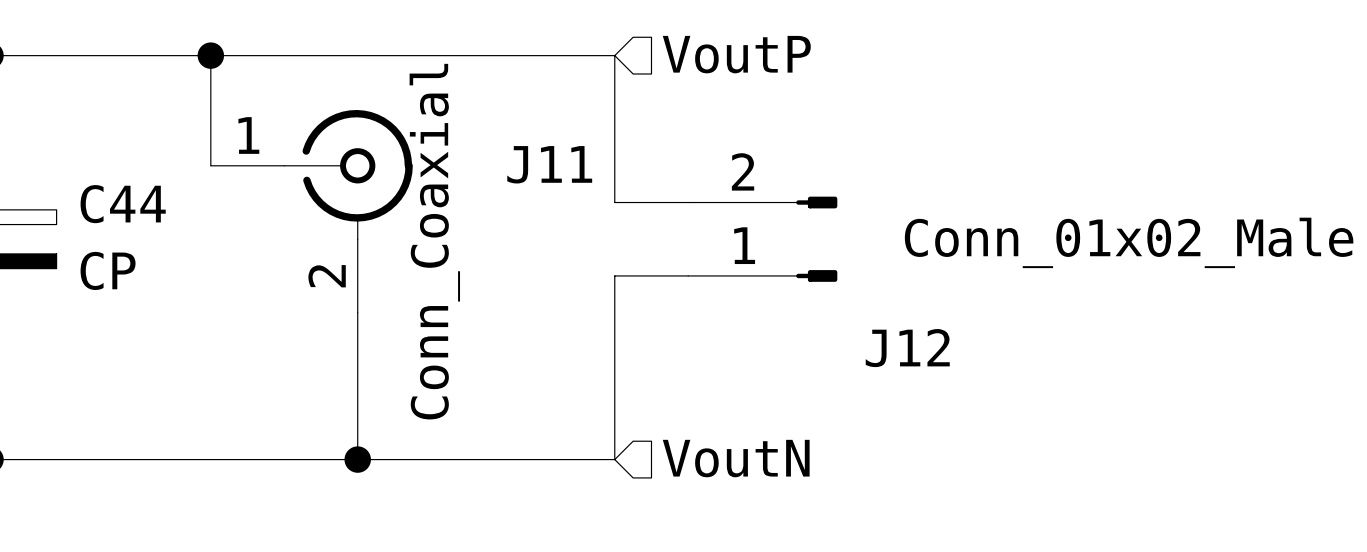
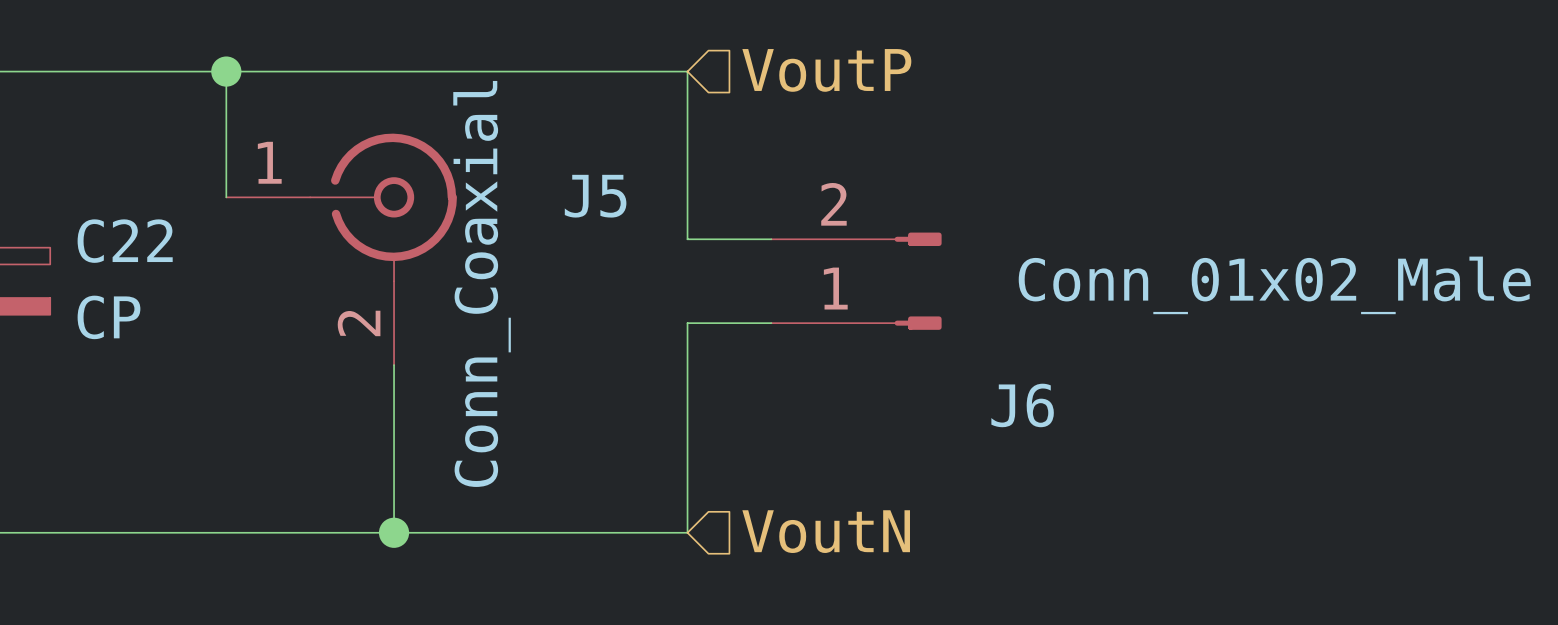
J11 name: J11 (549, 164) -> J5 (595, 196)
C44 name: C44 (123, 204) -> C22 (125, 241)
J12 name: J12 (907, 348) -> J6 (1022, 405)

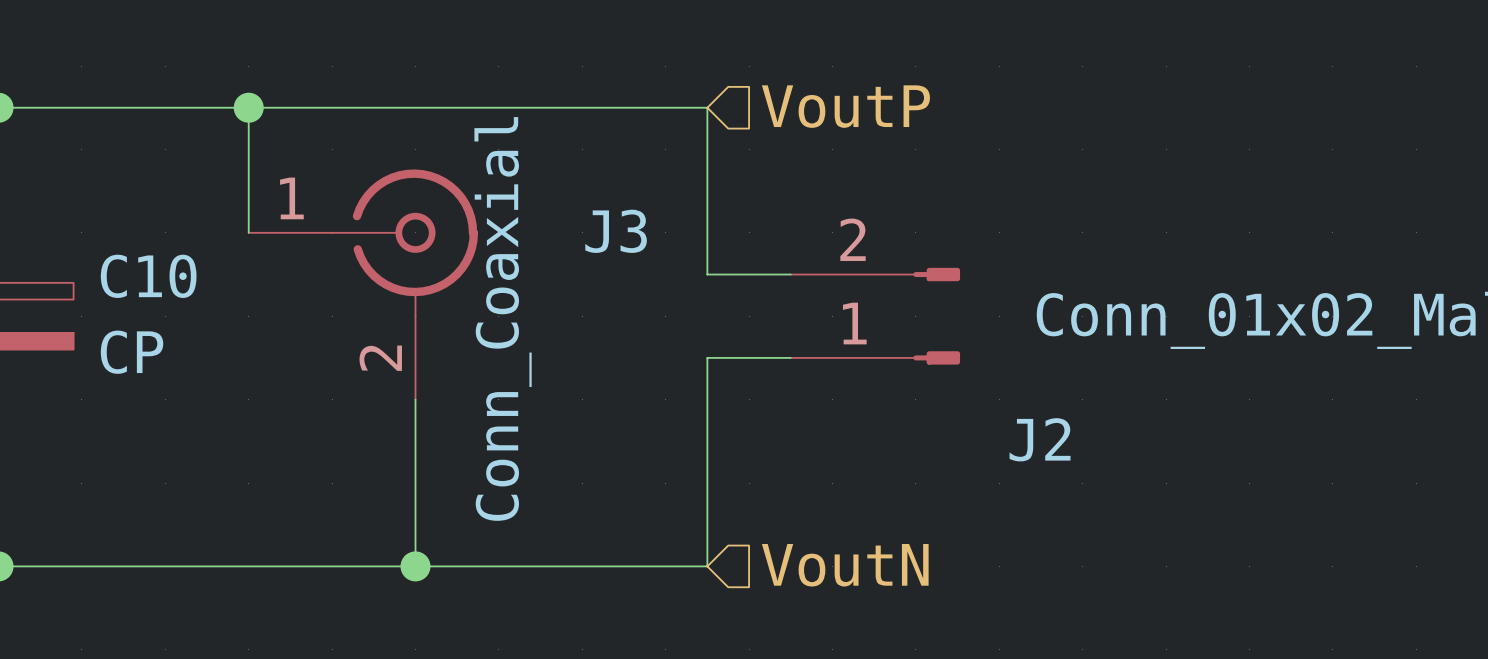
J5 name: J5 (595, 196) -> J3 (616, 231)
C22 name: C22 (125, 241) -> C10 (148, 276)
J6 name: J6 (1022, 405) -> J2 (1040, 439)

